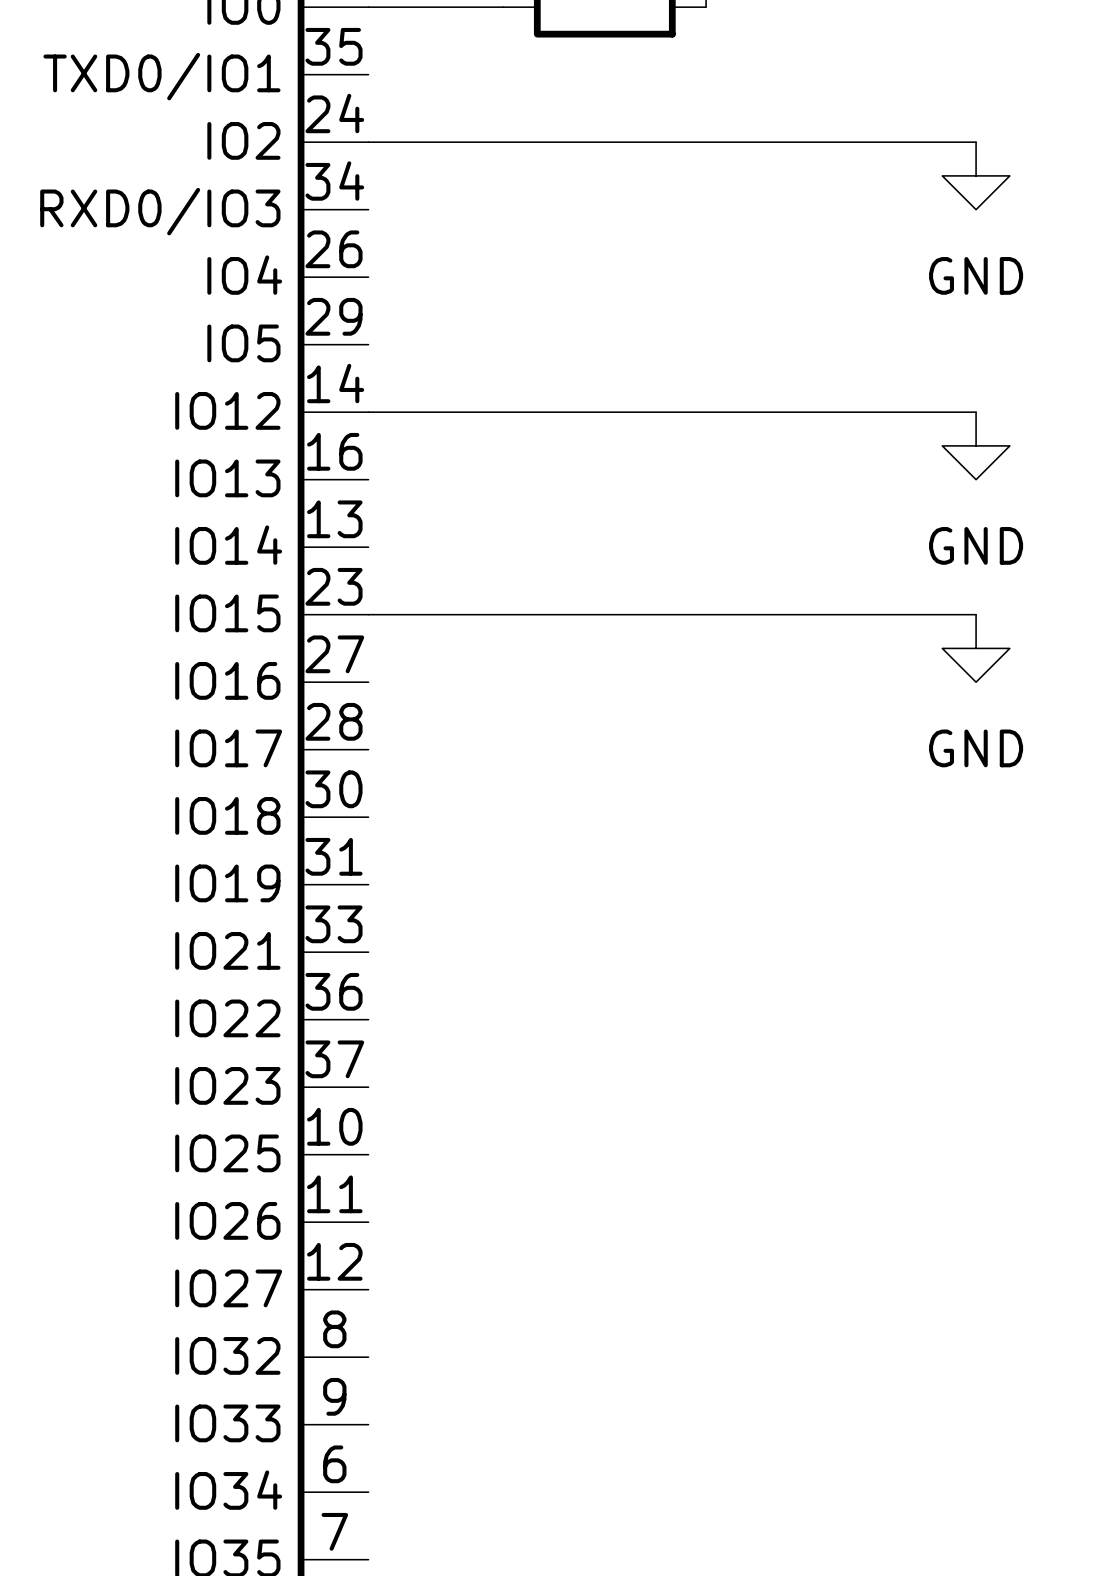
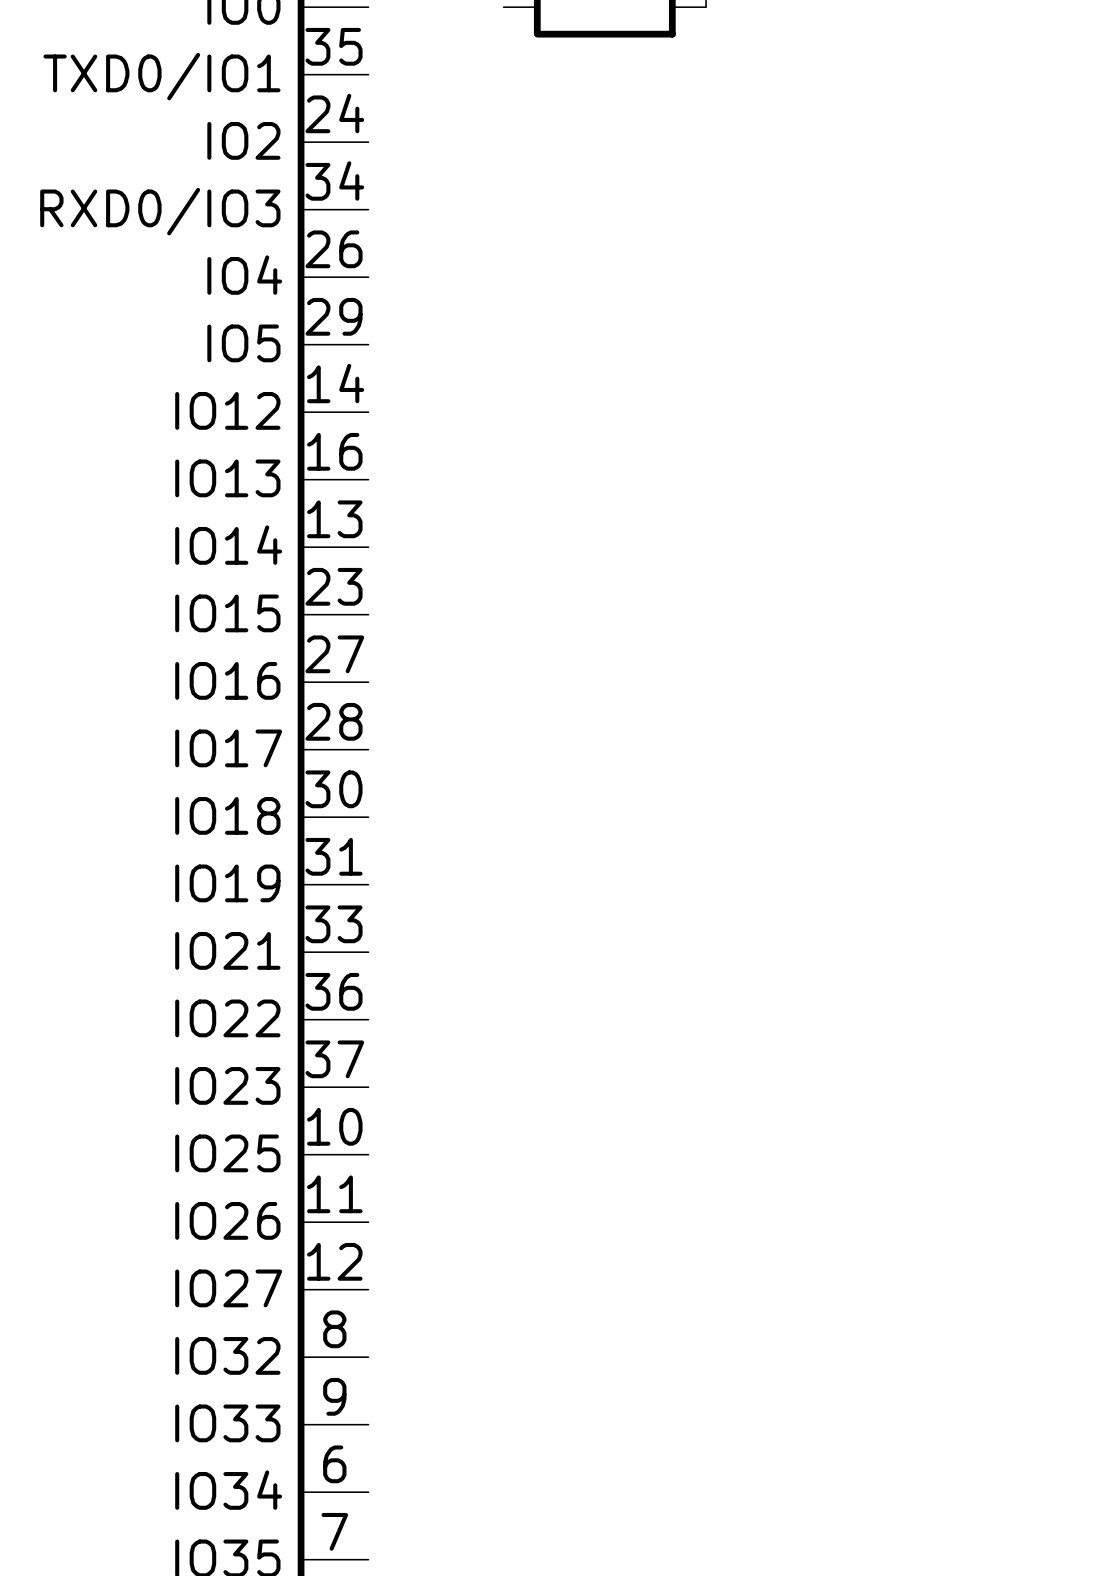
wire: (368, 7) (503, 7) -> none
wire: (368, 142) (976, 142) -> none
power symbol: GND (976, 175) -> none
wire: (368, 412) (976, 412) -> none
power symbol: GND (976, 445) -> none
wire: (368, 614) (976, 614) -> none
power symbol: GND (976, 648) -> none

